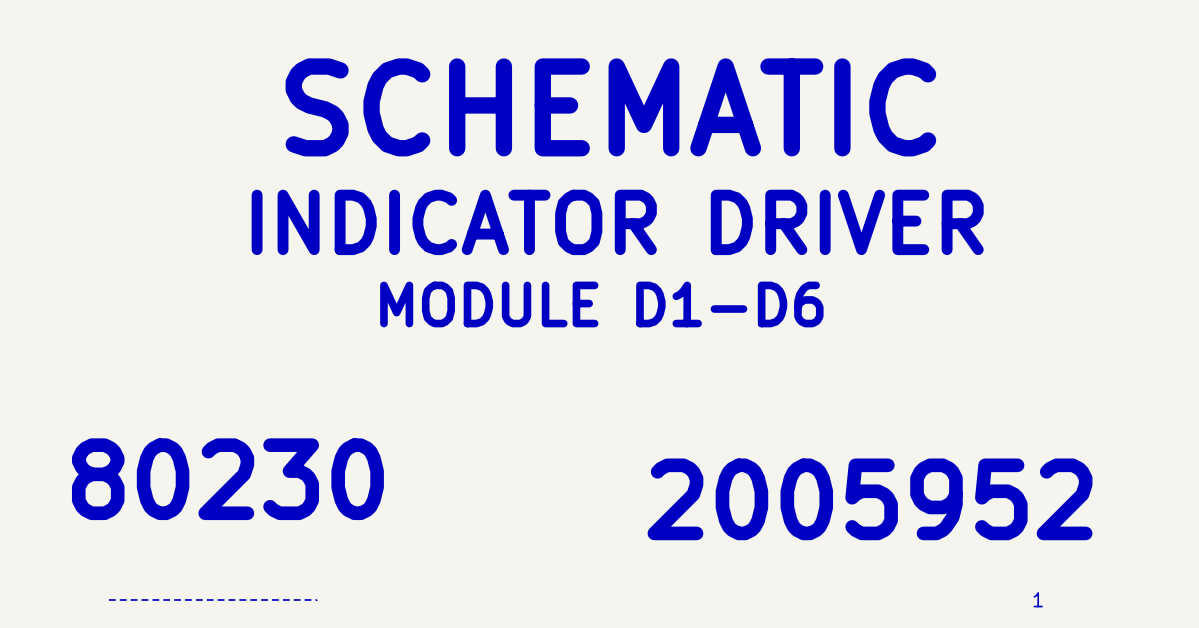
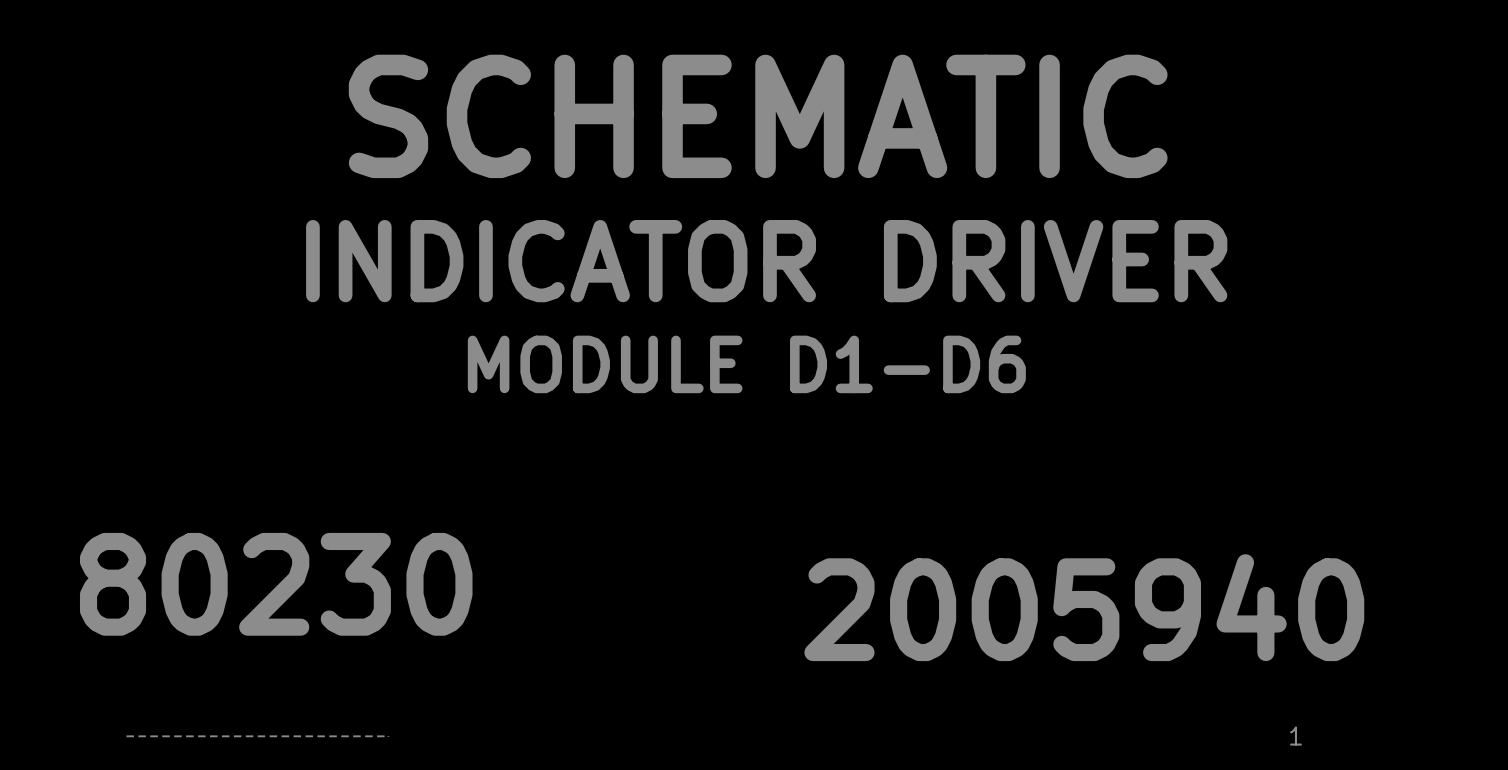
text: 2005952 (870, 499) -> 2005940 (1084, 607)

